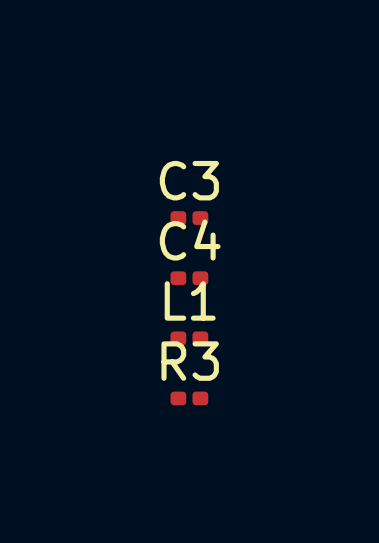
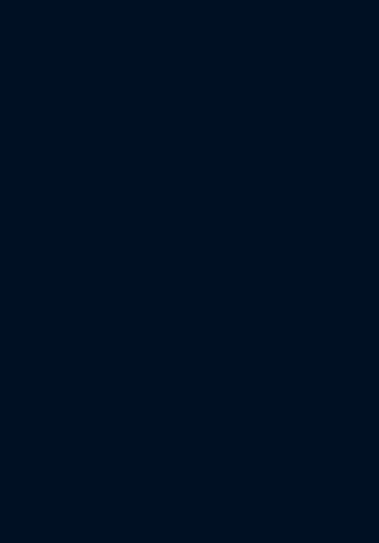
C3: (189, 218) -> none
C4: (189, 278) -> none
L1: (189, 338) -> none
R3: (189, 398) -> none

